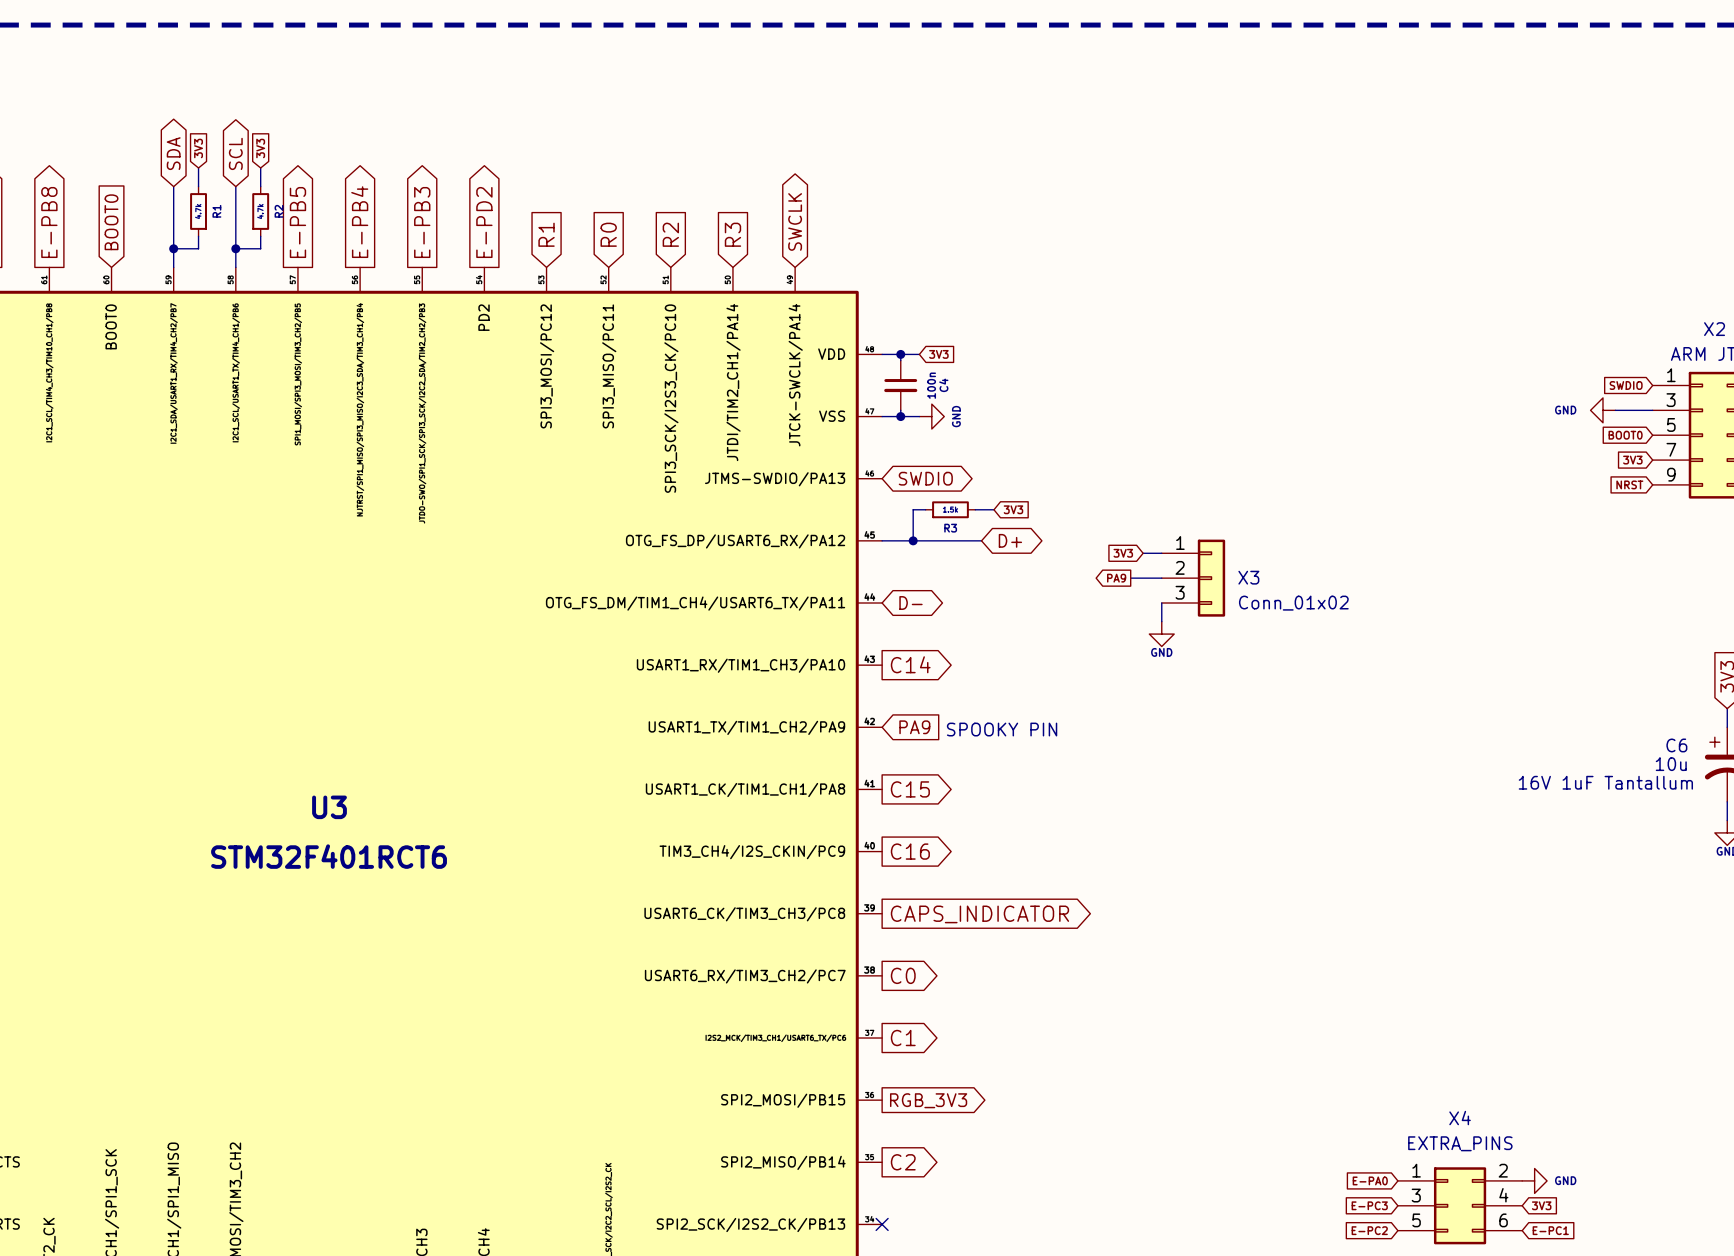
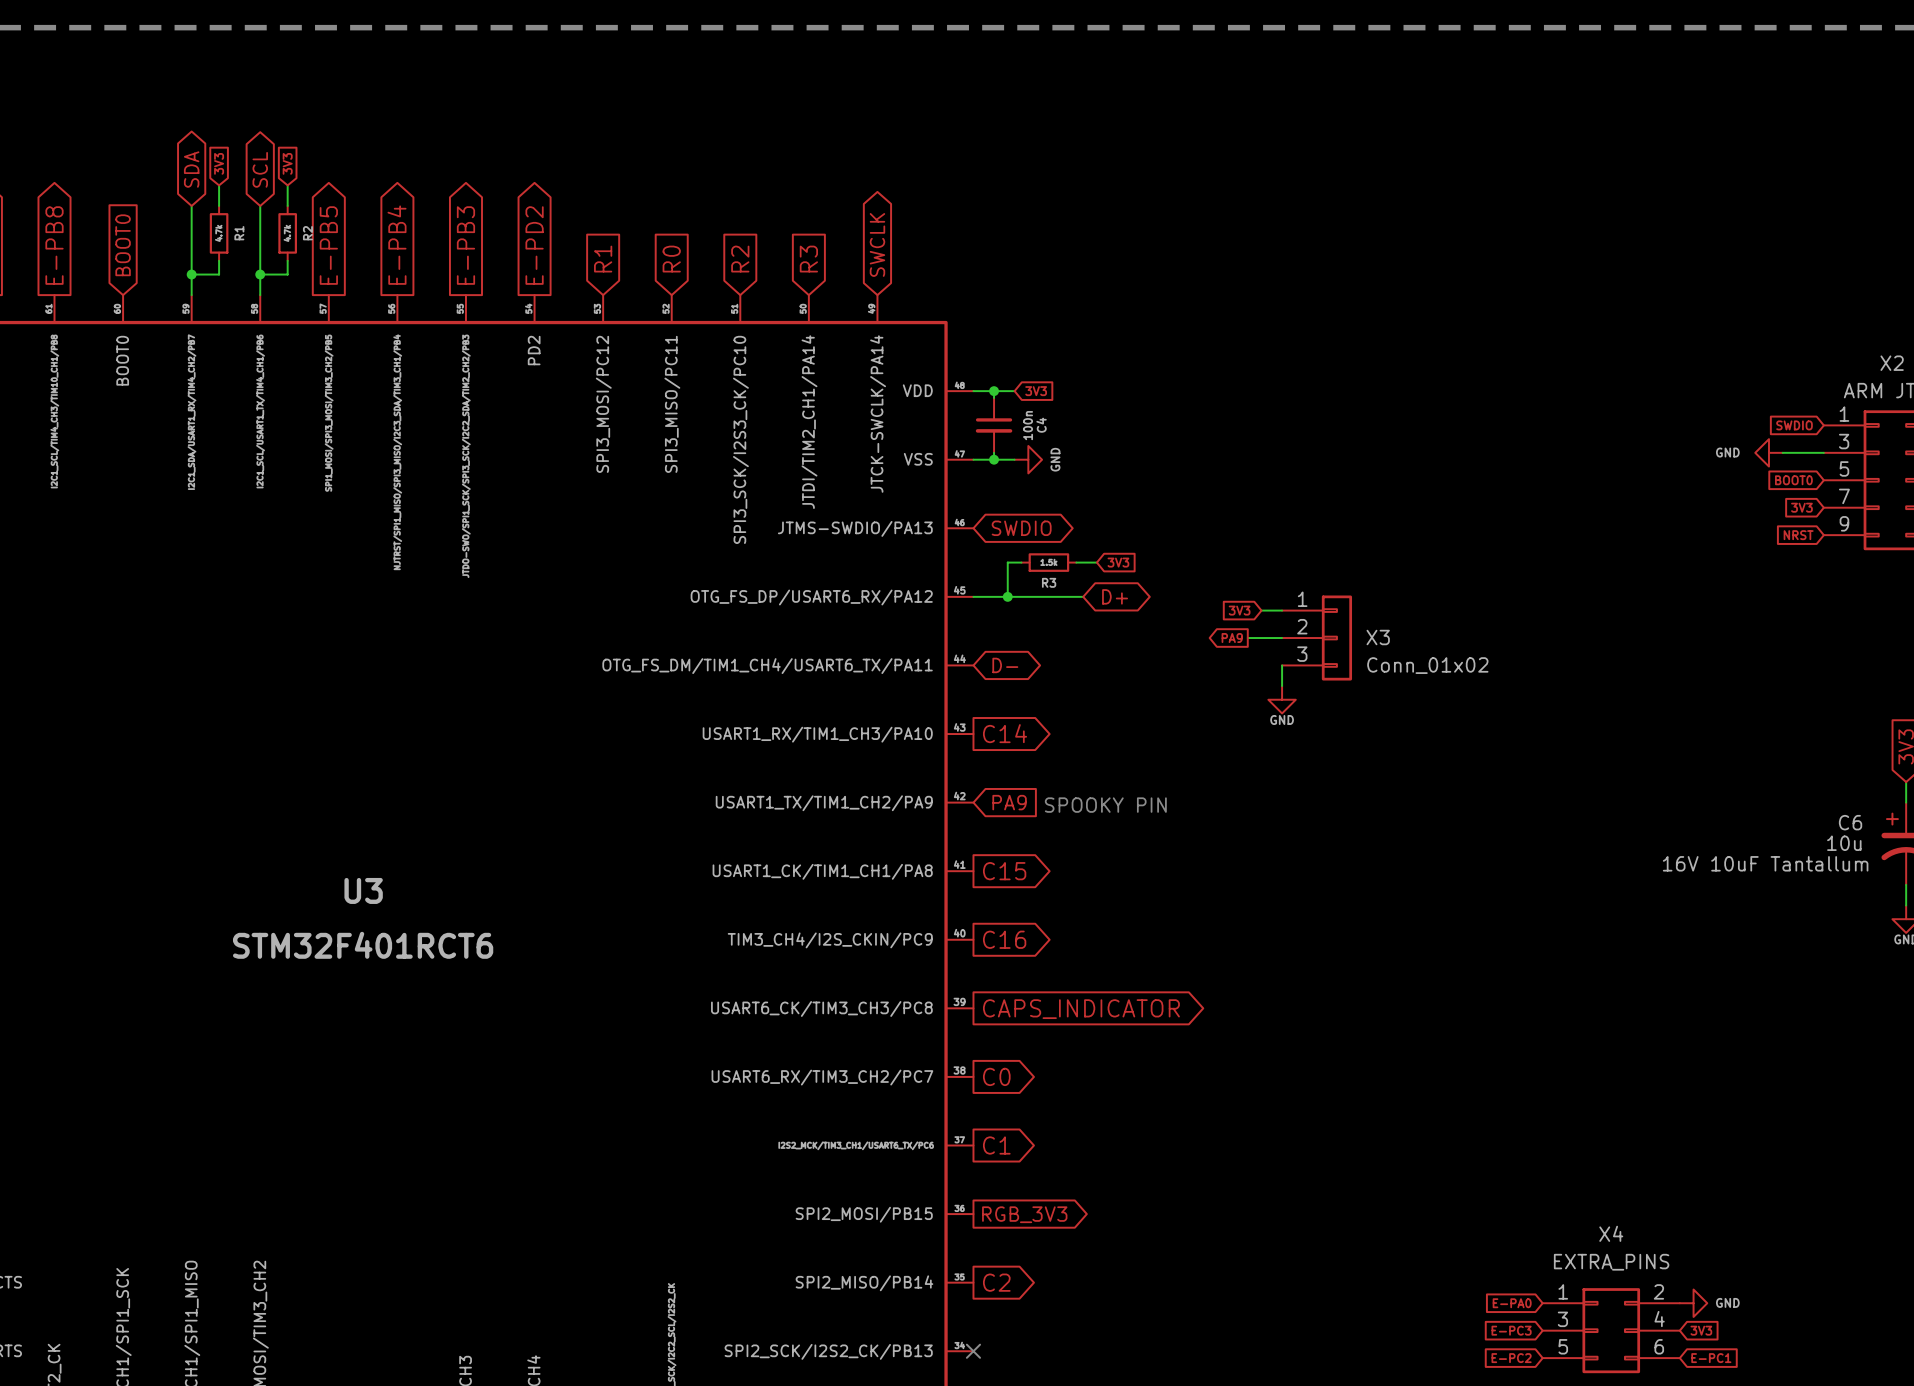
C6 text: 16V 1uF Tantallum (1605, 782) -> 16V 10uF Tantallum (1765, 863)

